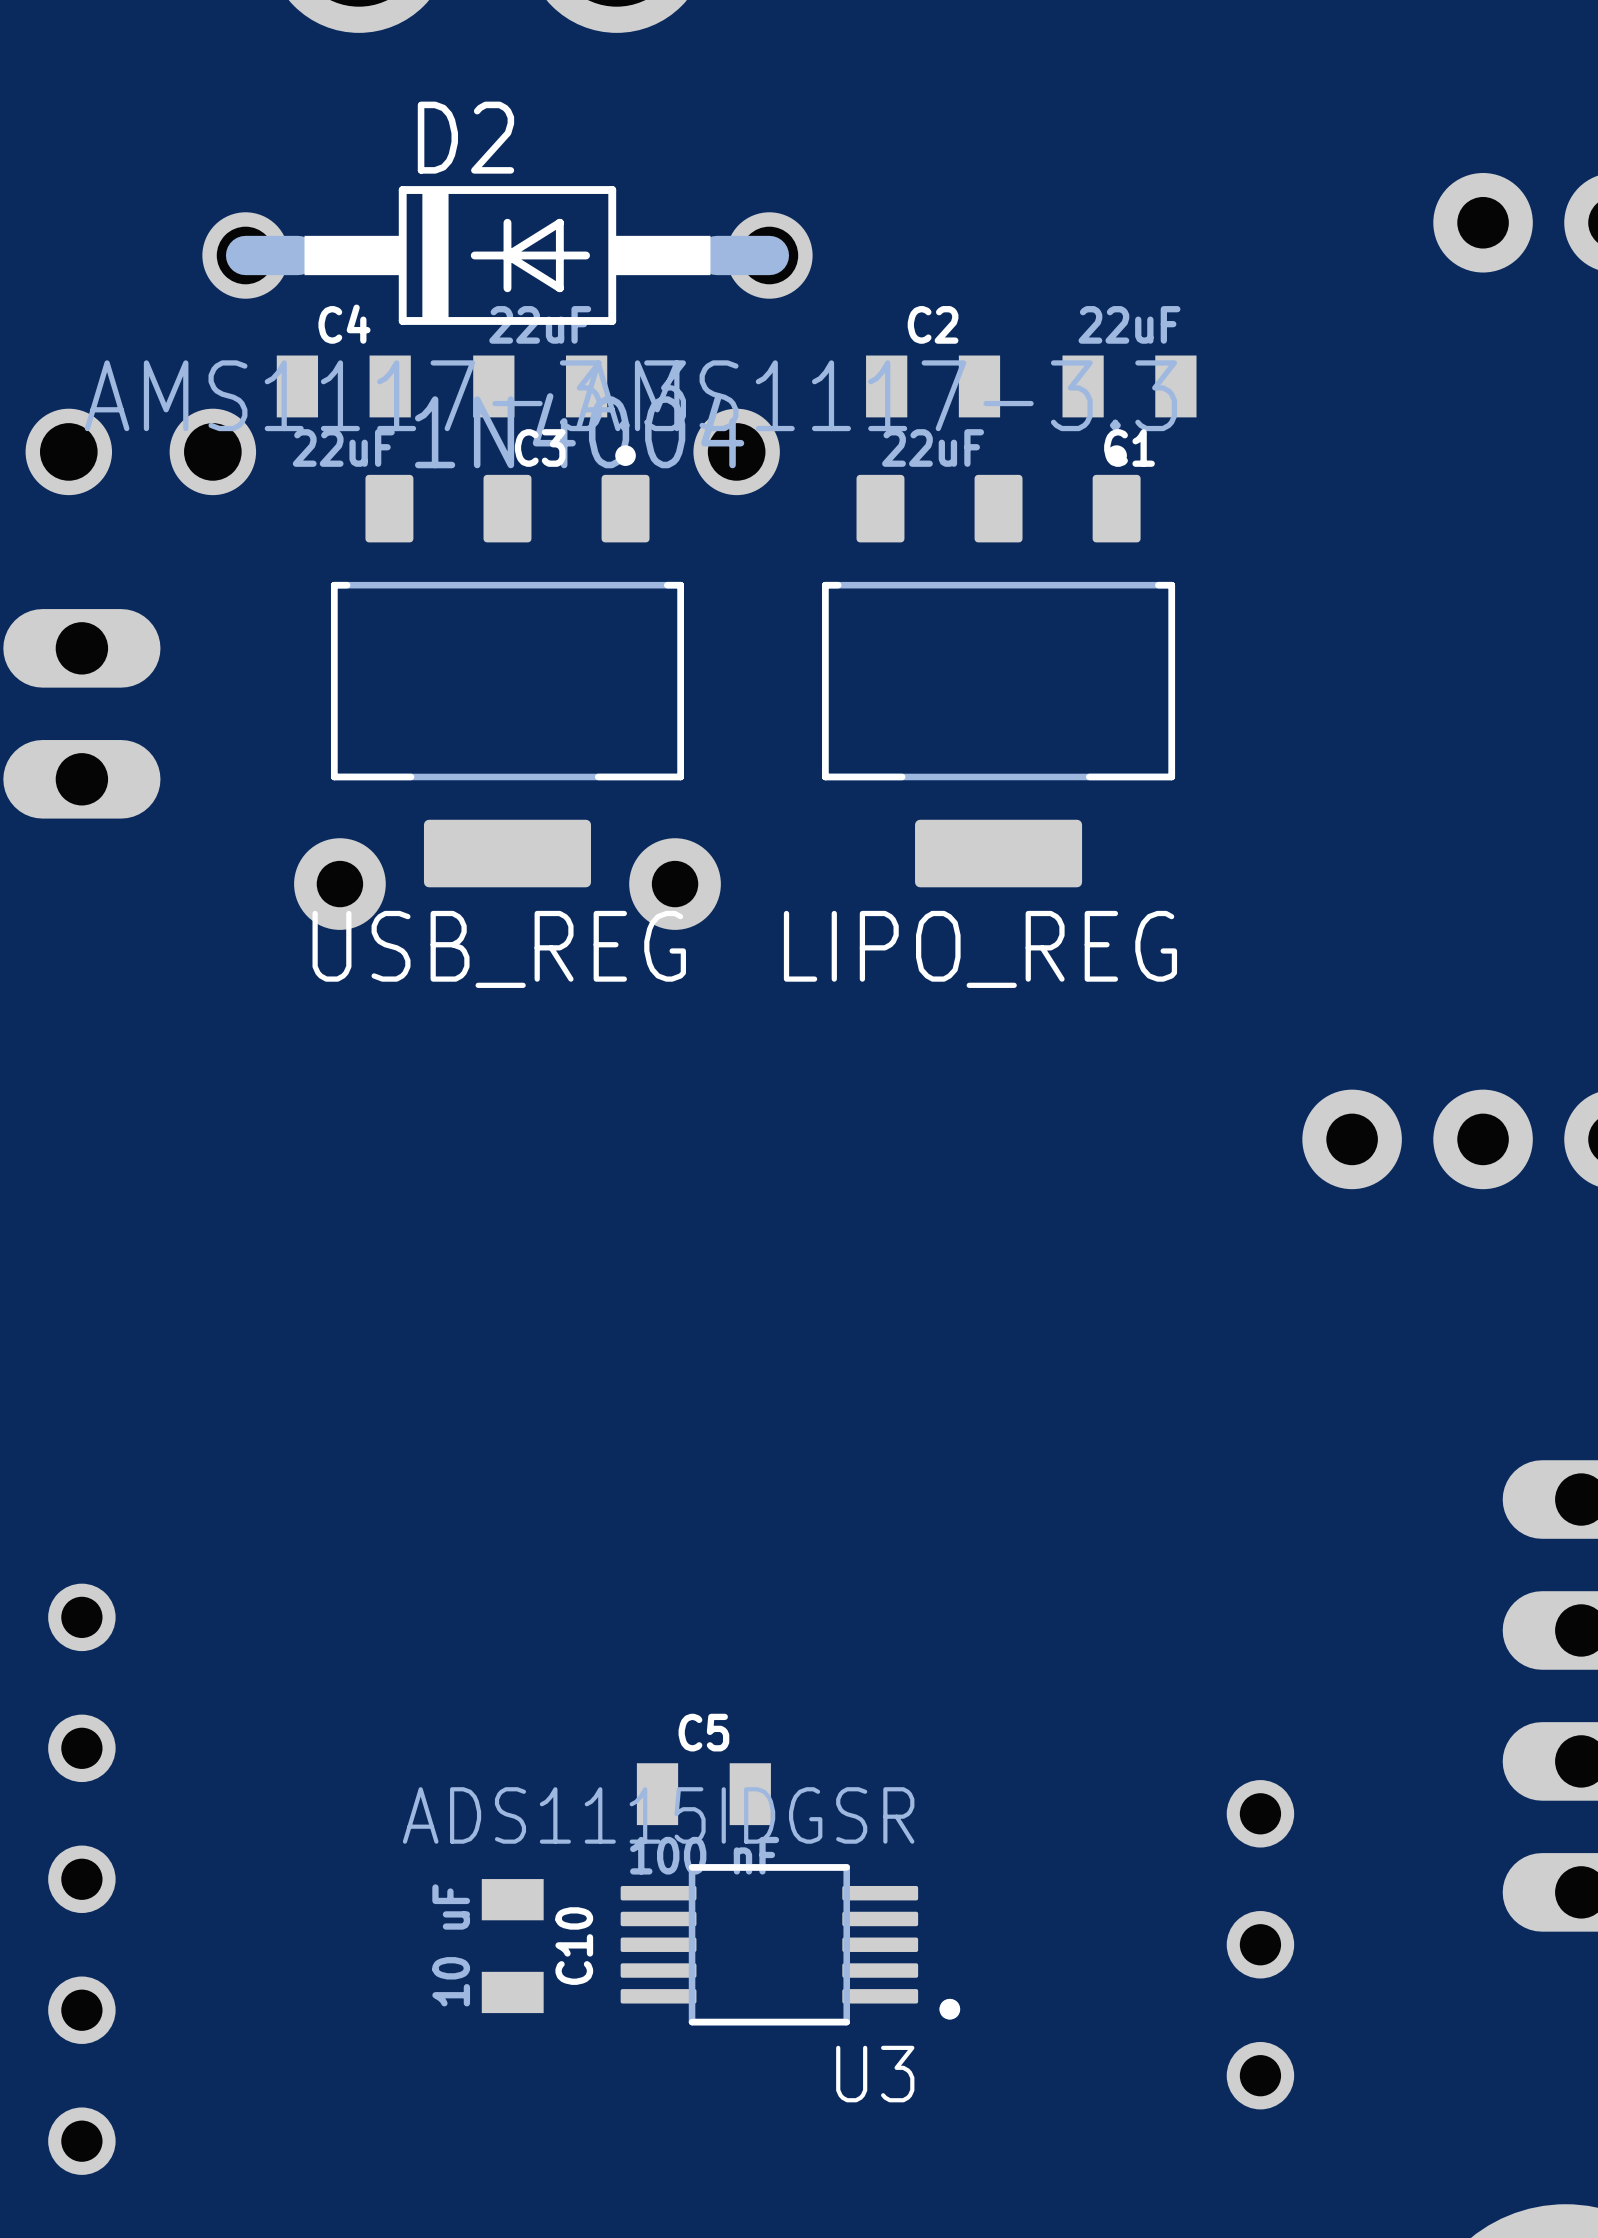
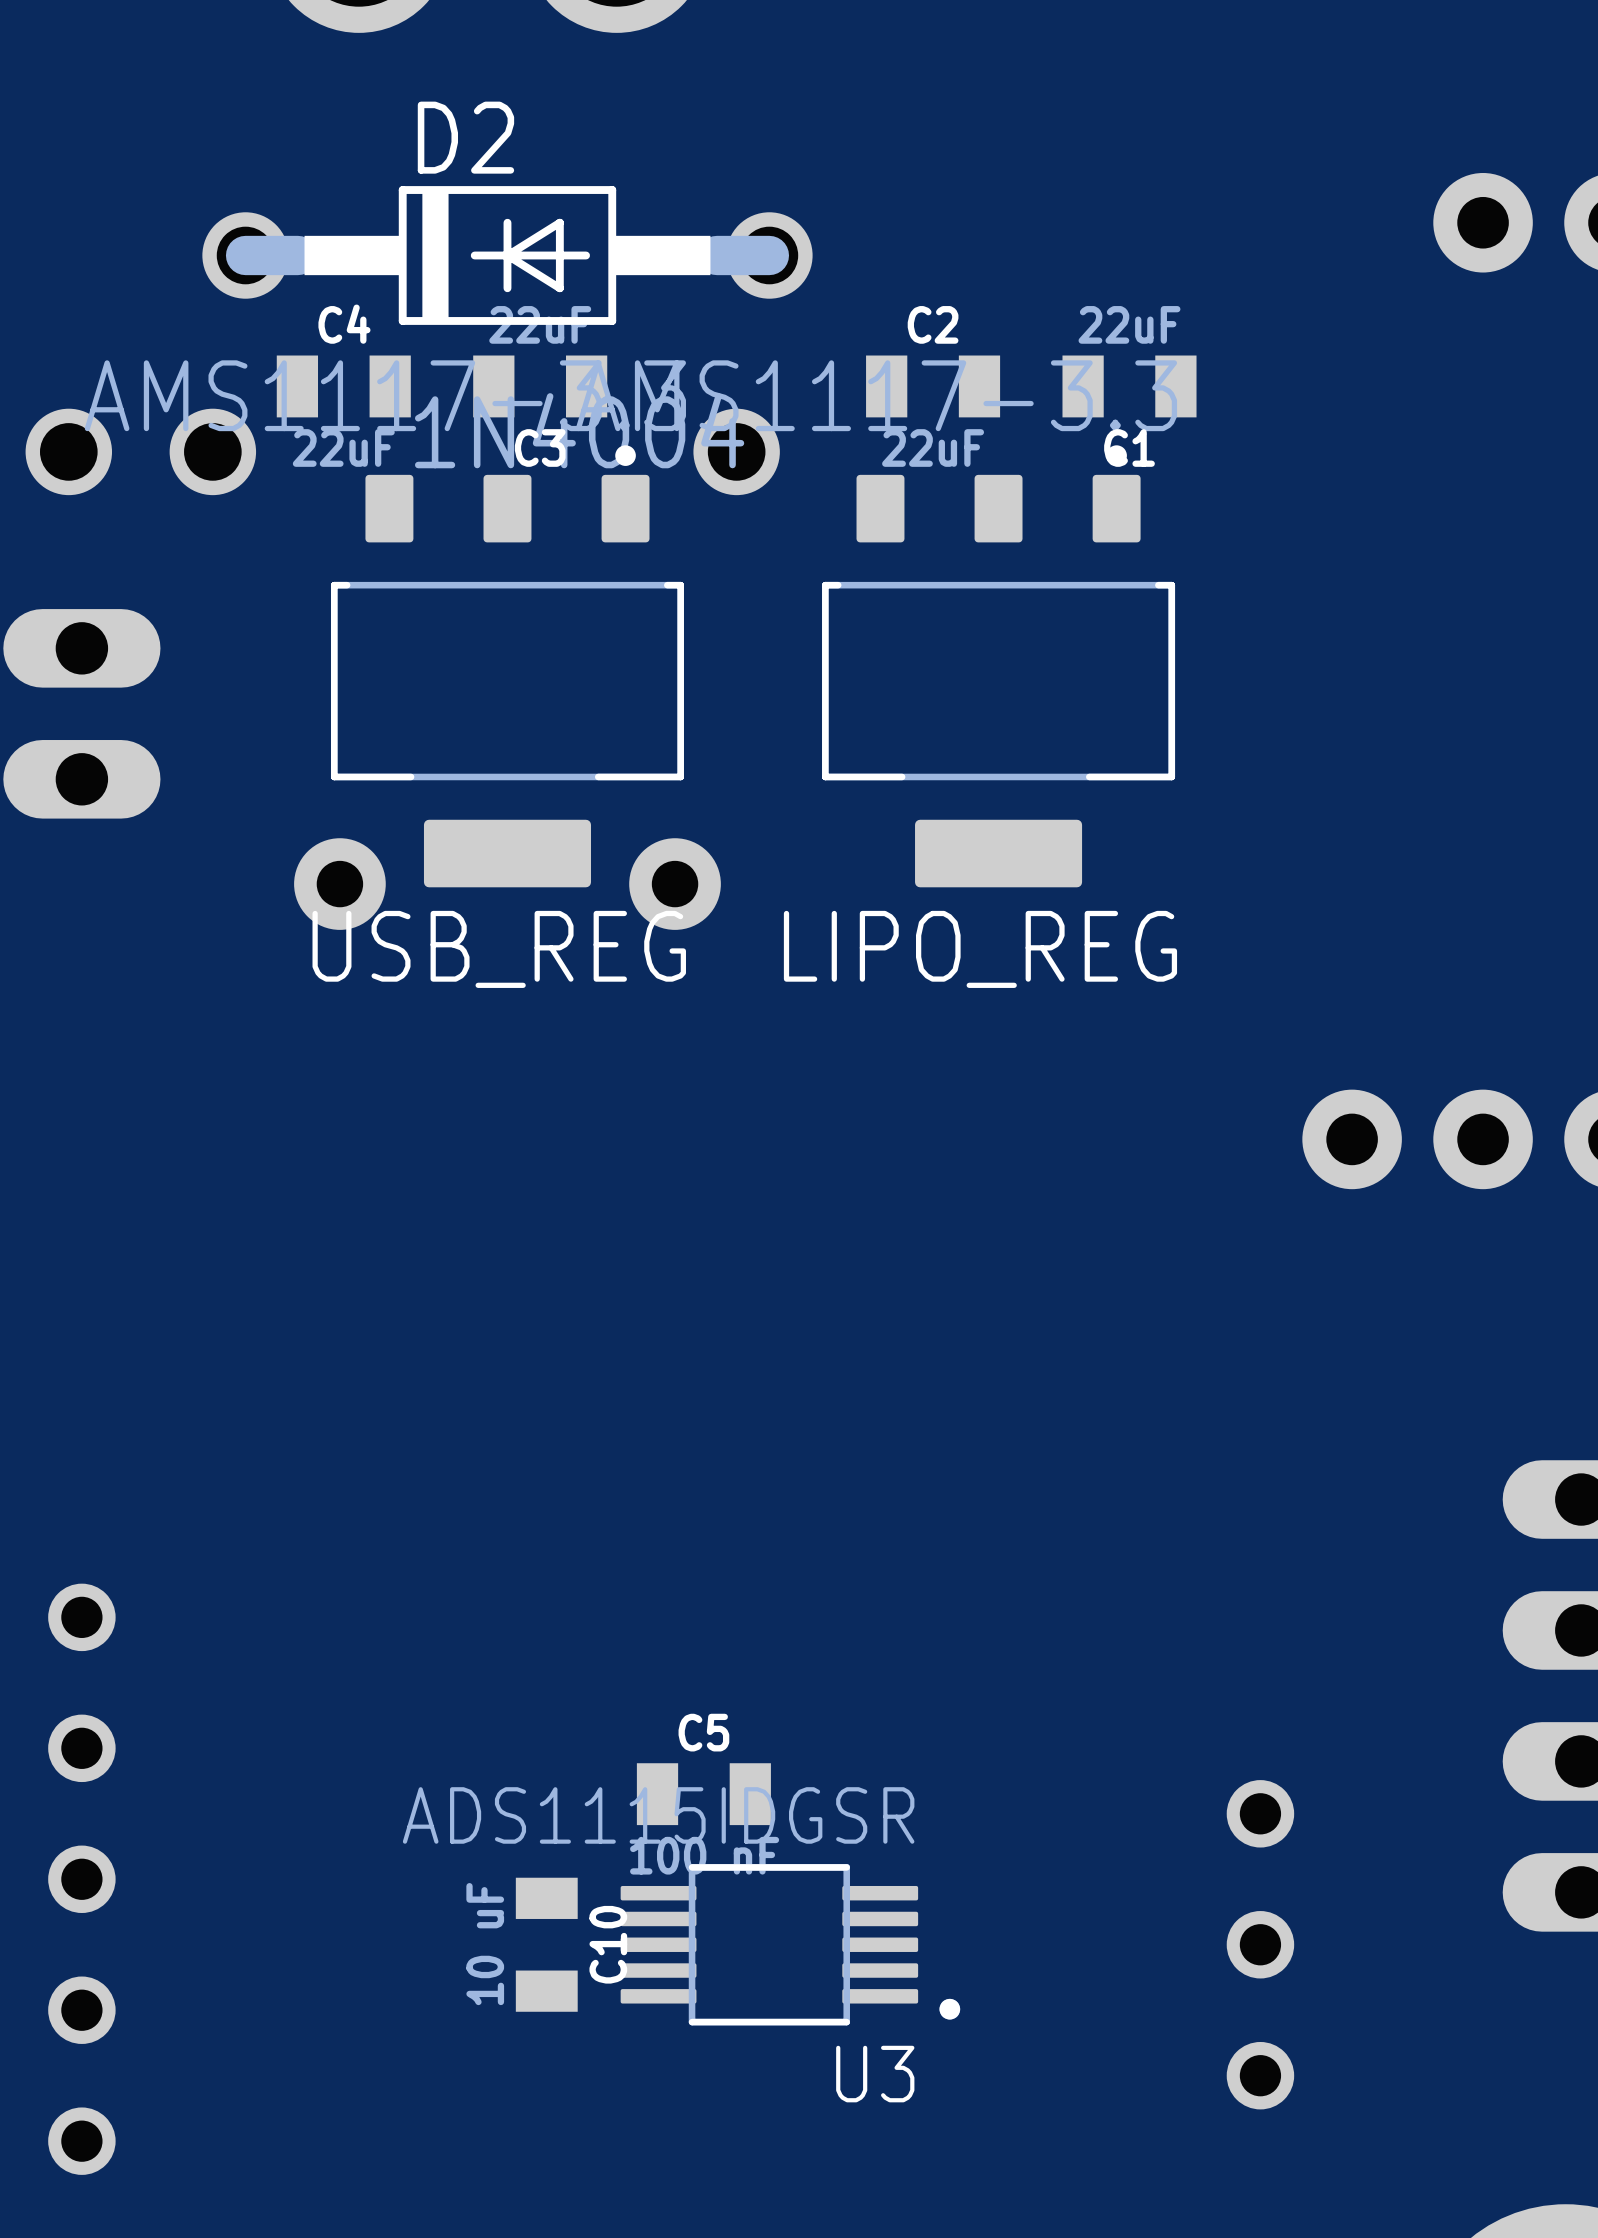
C10 position: (512, 1946) -> (546, 1944)

